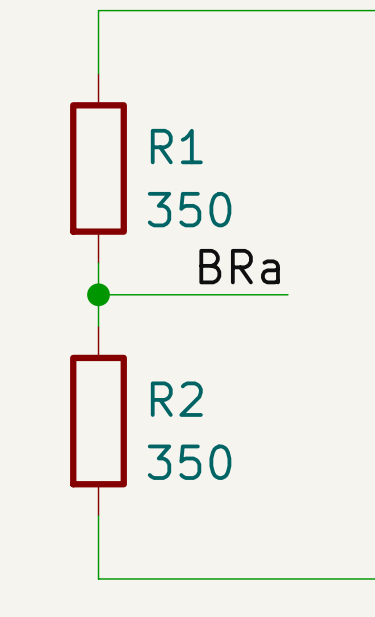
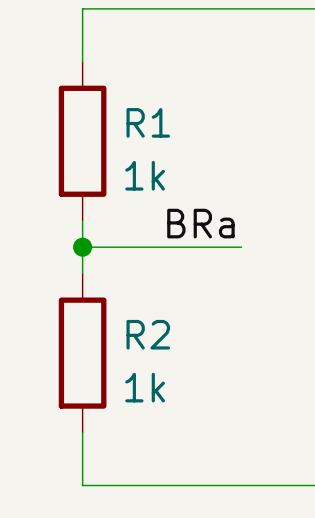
R1 value: 350 (189, 209) -> 1k (145, 175)
R2 value: 350 (189, 462) -> 1k (145, 387)

